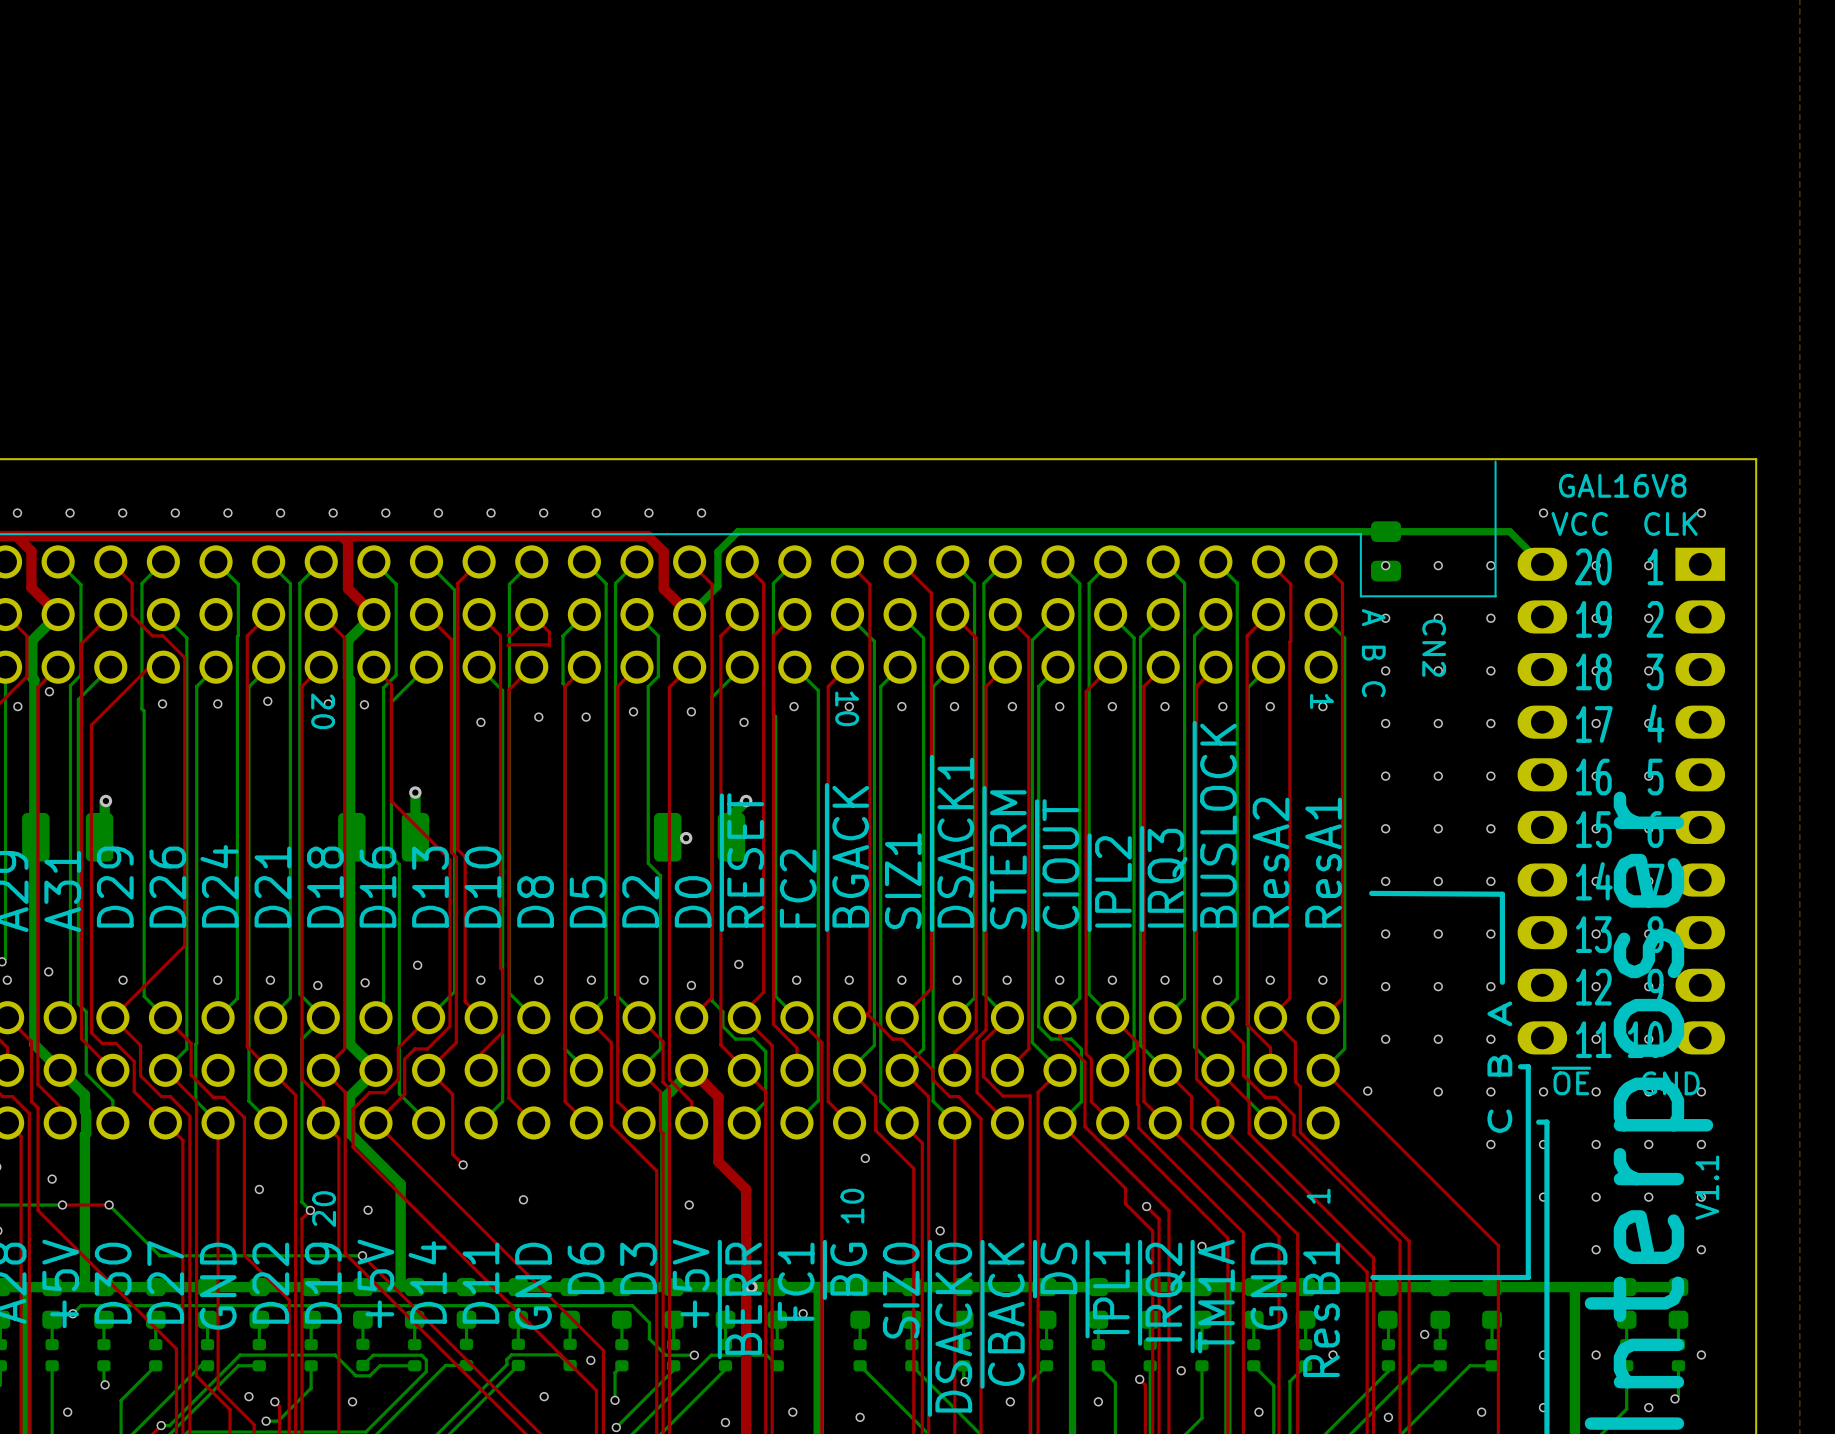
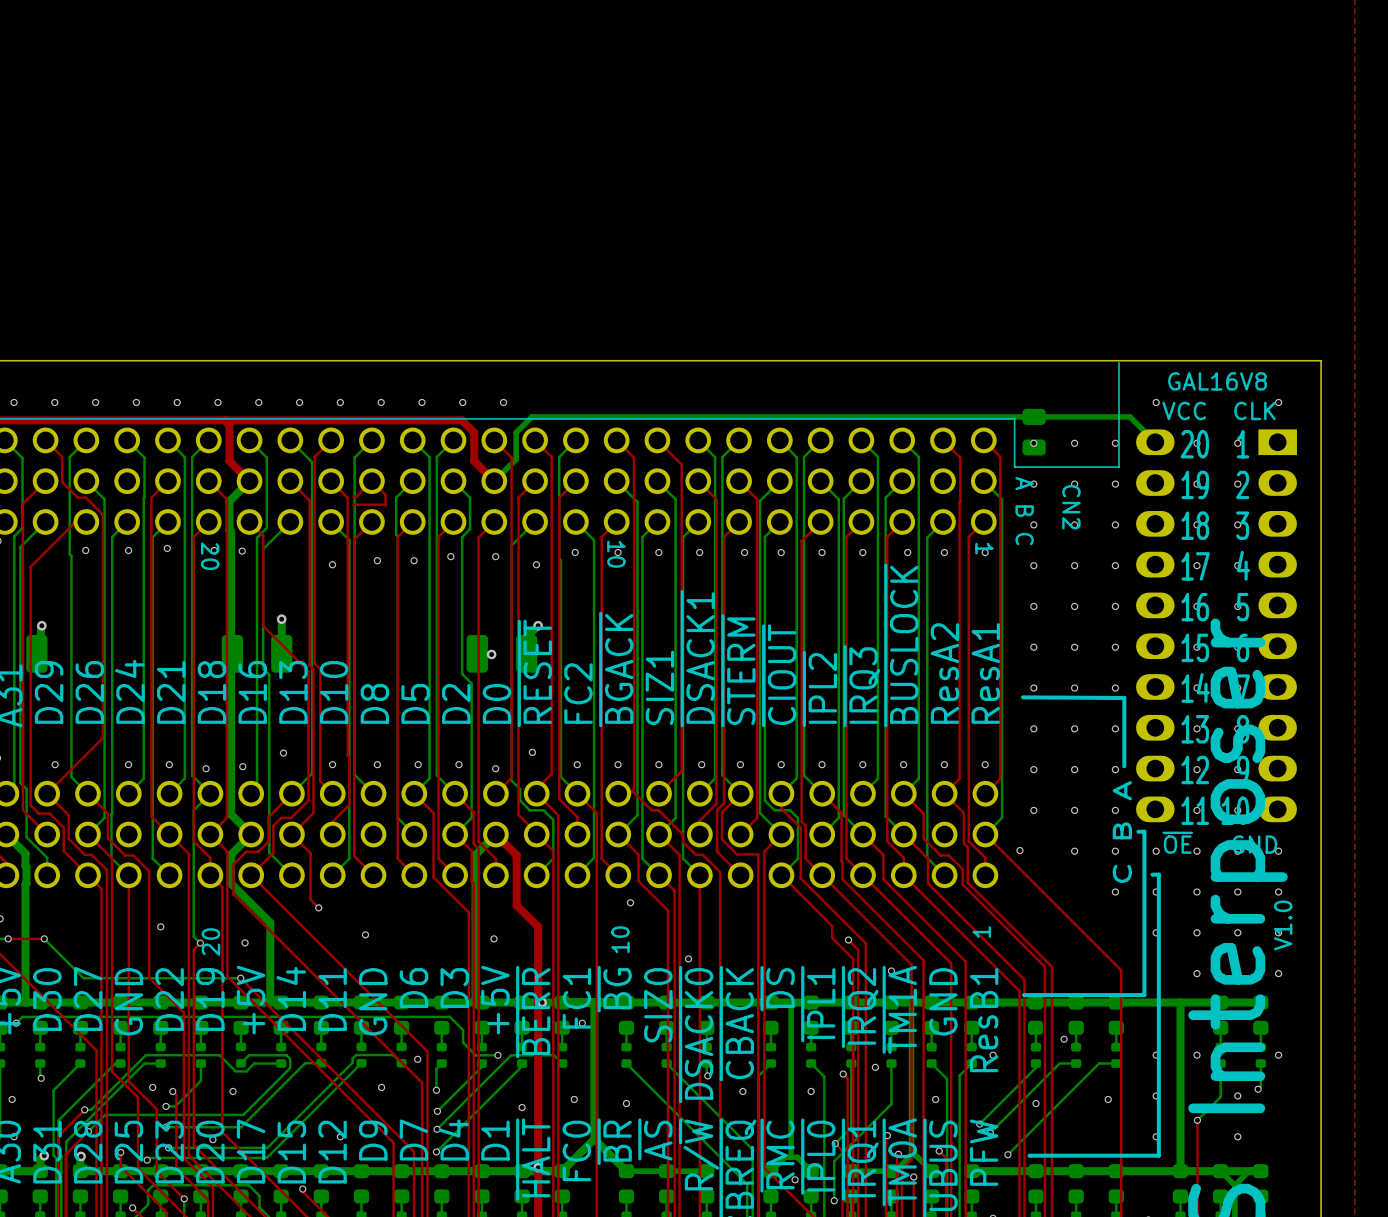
top track: (1268, 614) (1247, 635) (1247, 1024) (1270, 1047) (1270, 1070) -> none
top track: none -> (983, 521) (968, 536) (968, 841) (985, 857) (985, 875)
text: V1.1 (1707, 1187) -> V1.0 (1283, 925)

